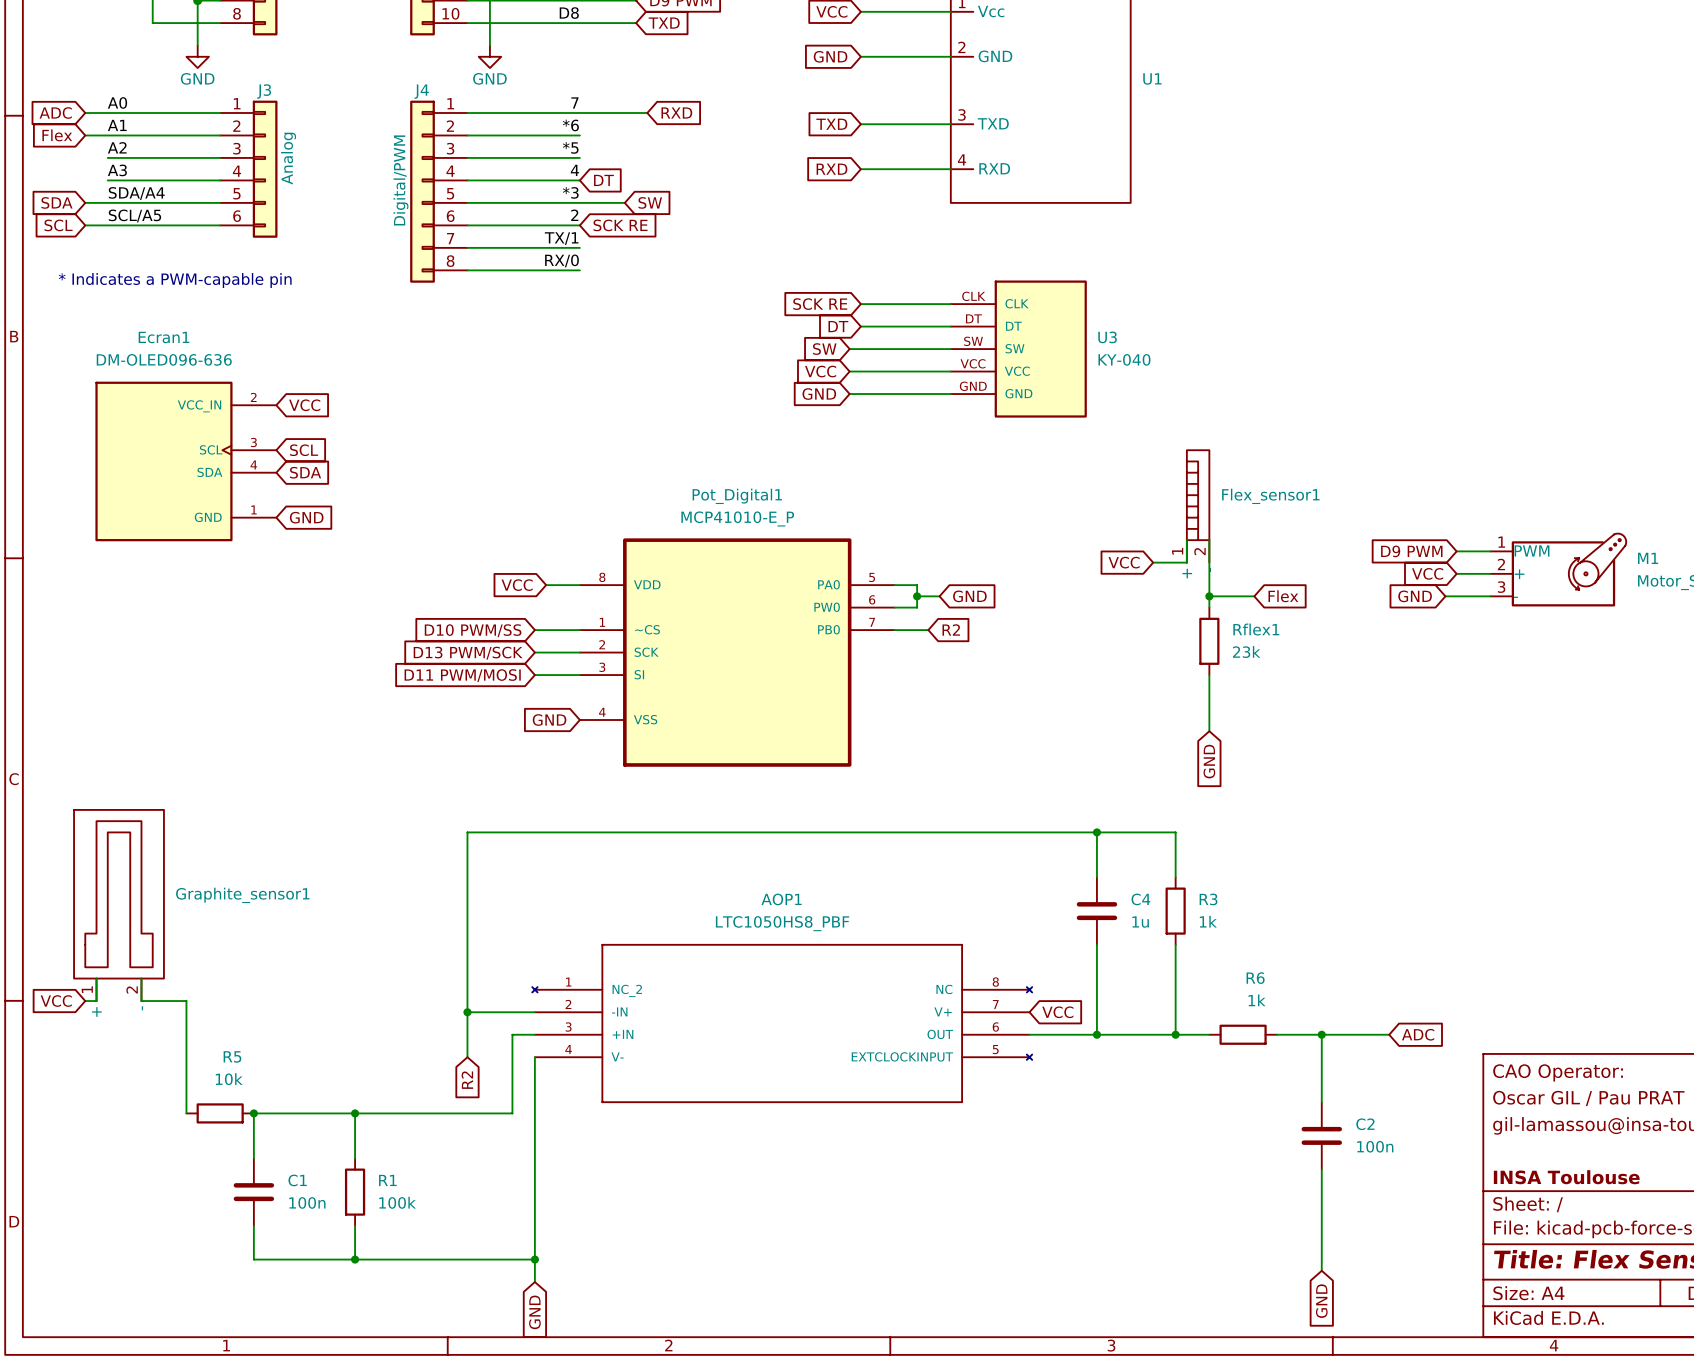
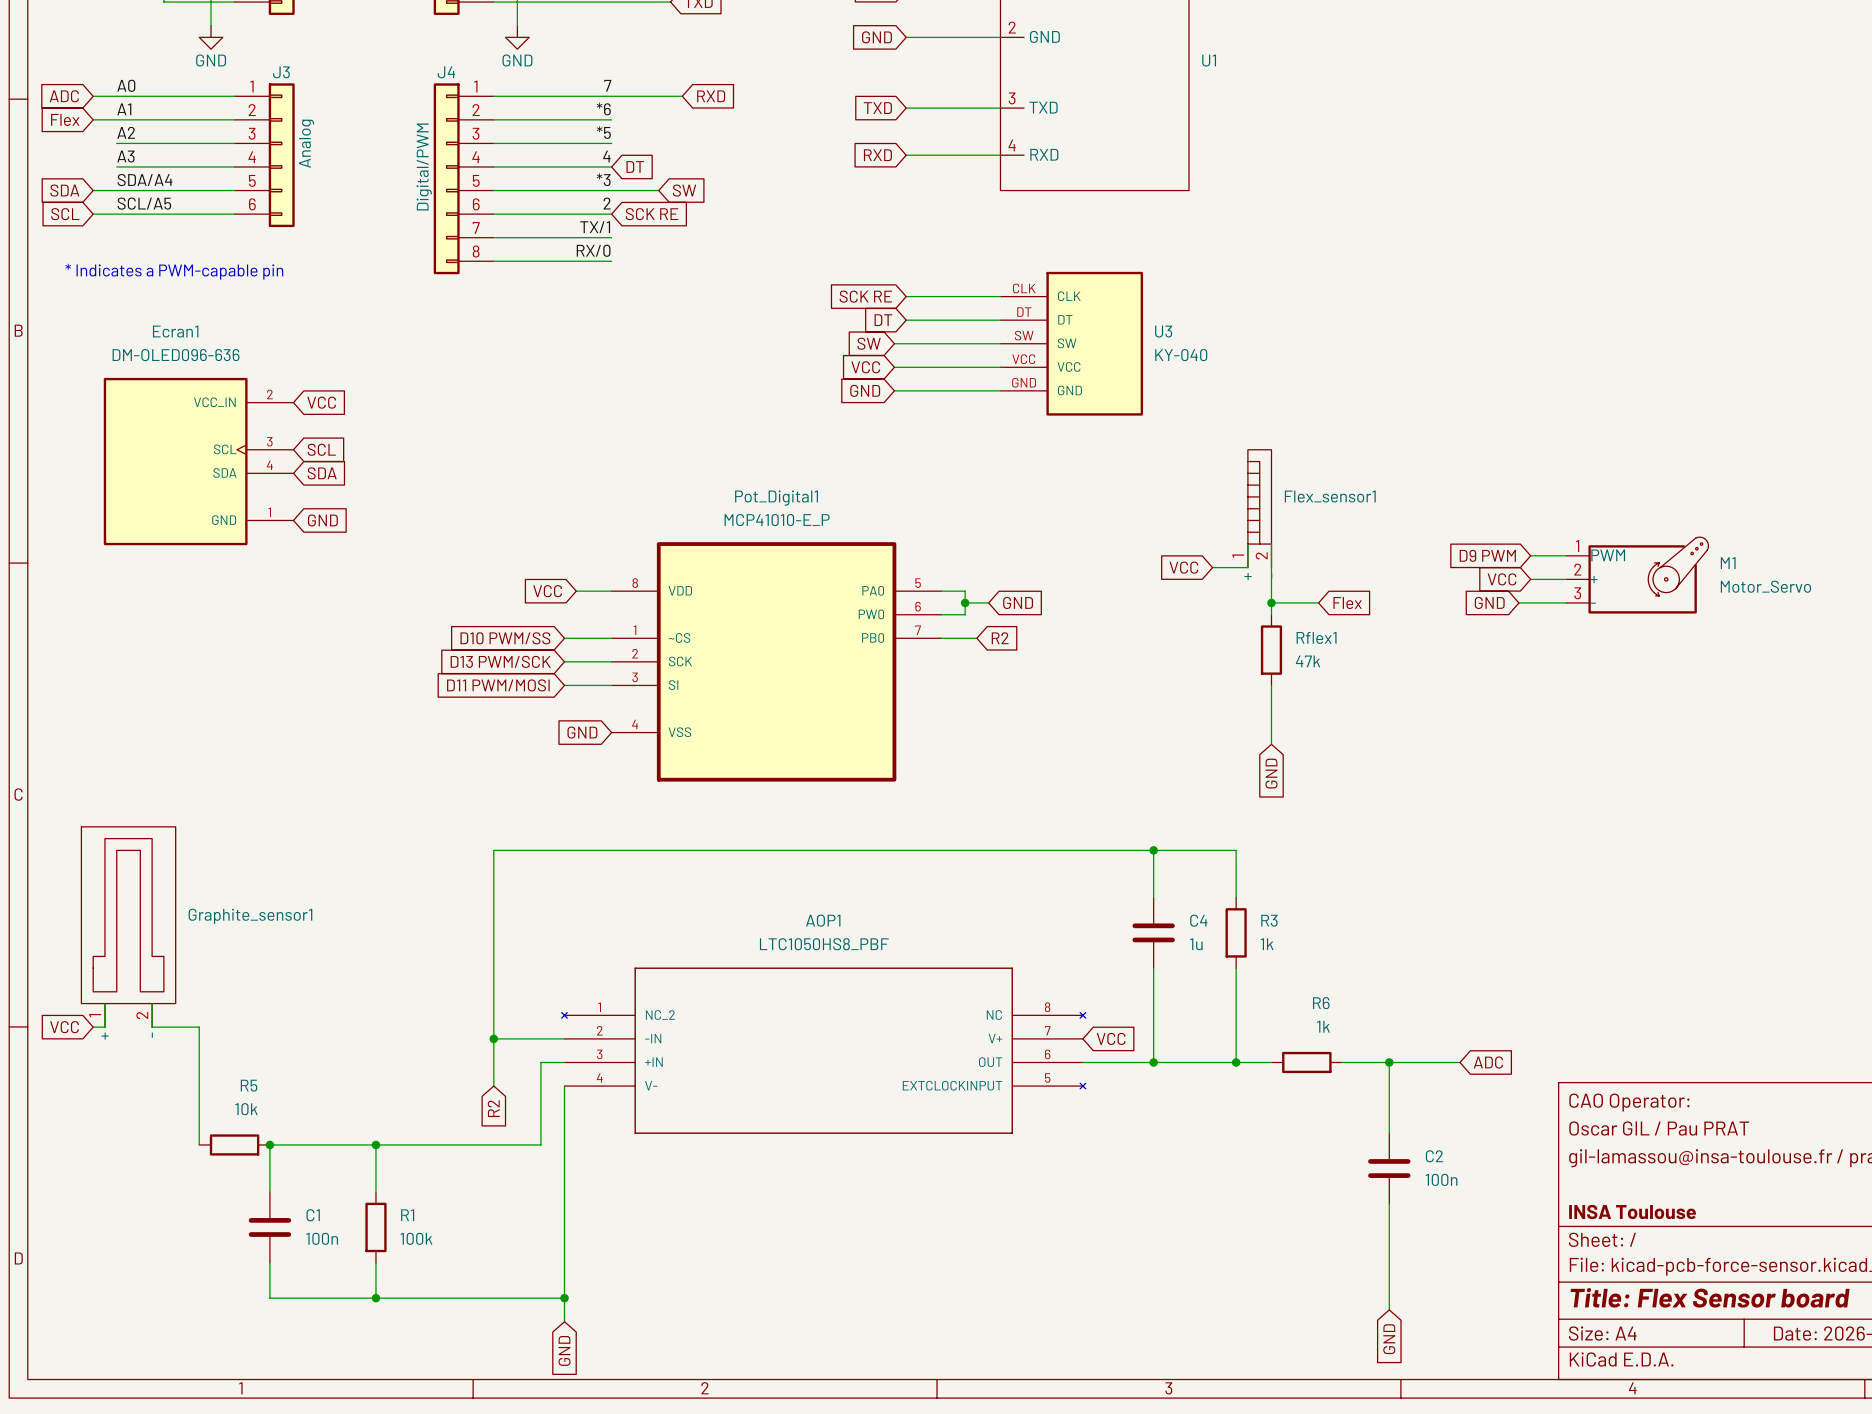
Rflex1 value: 23k (1246, 652) -> 47k (1308, 661)

